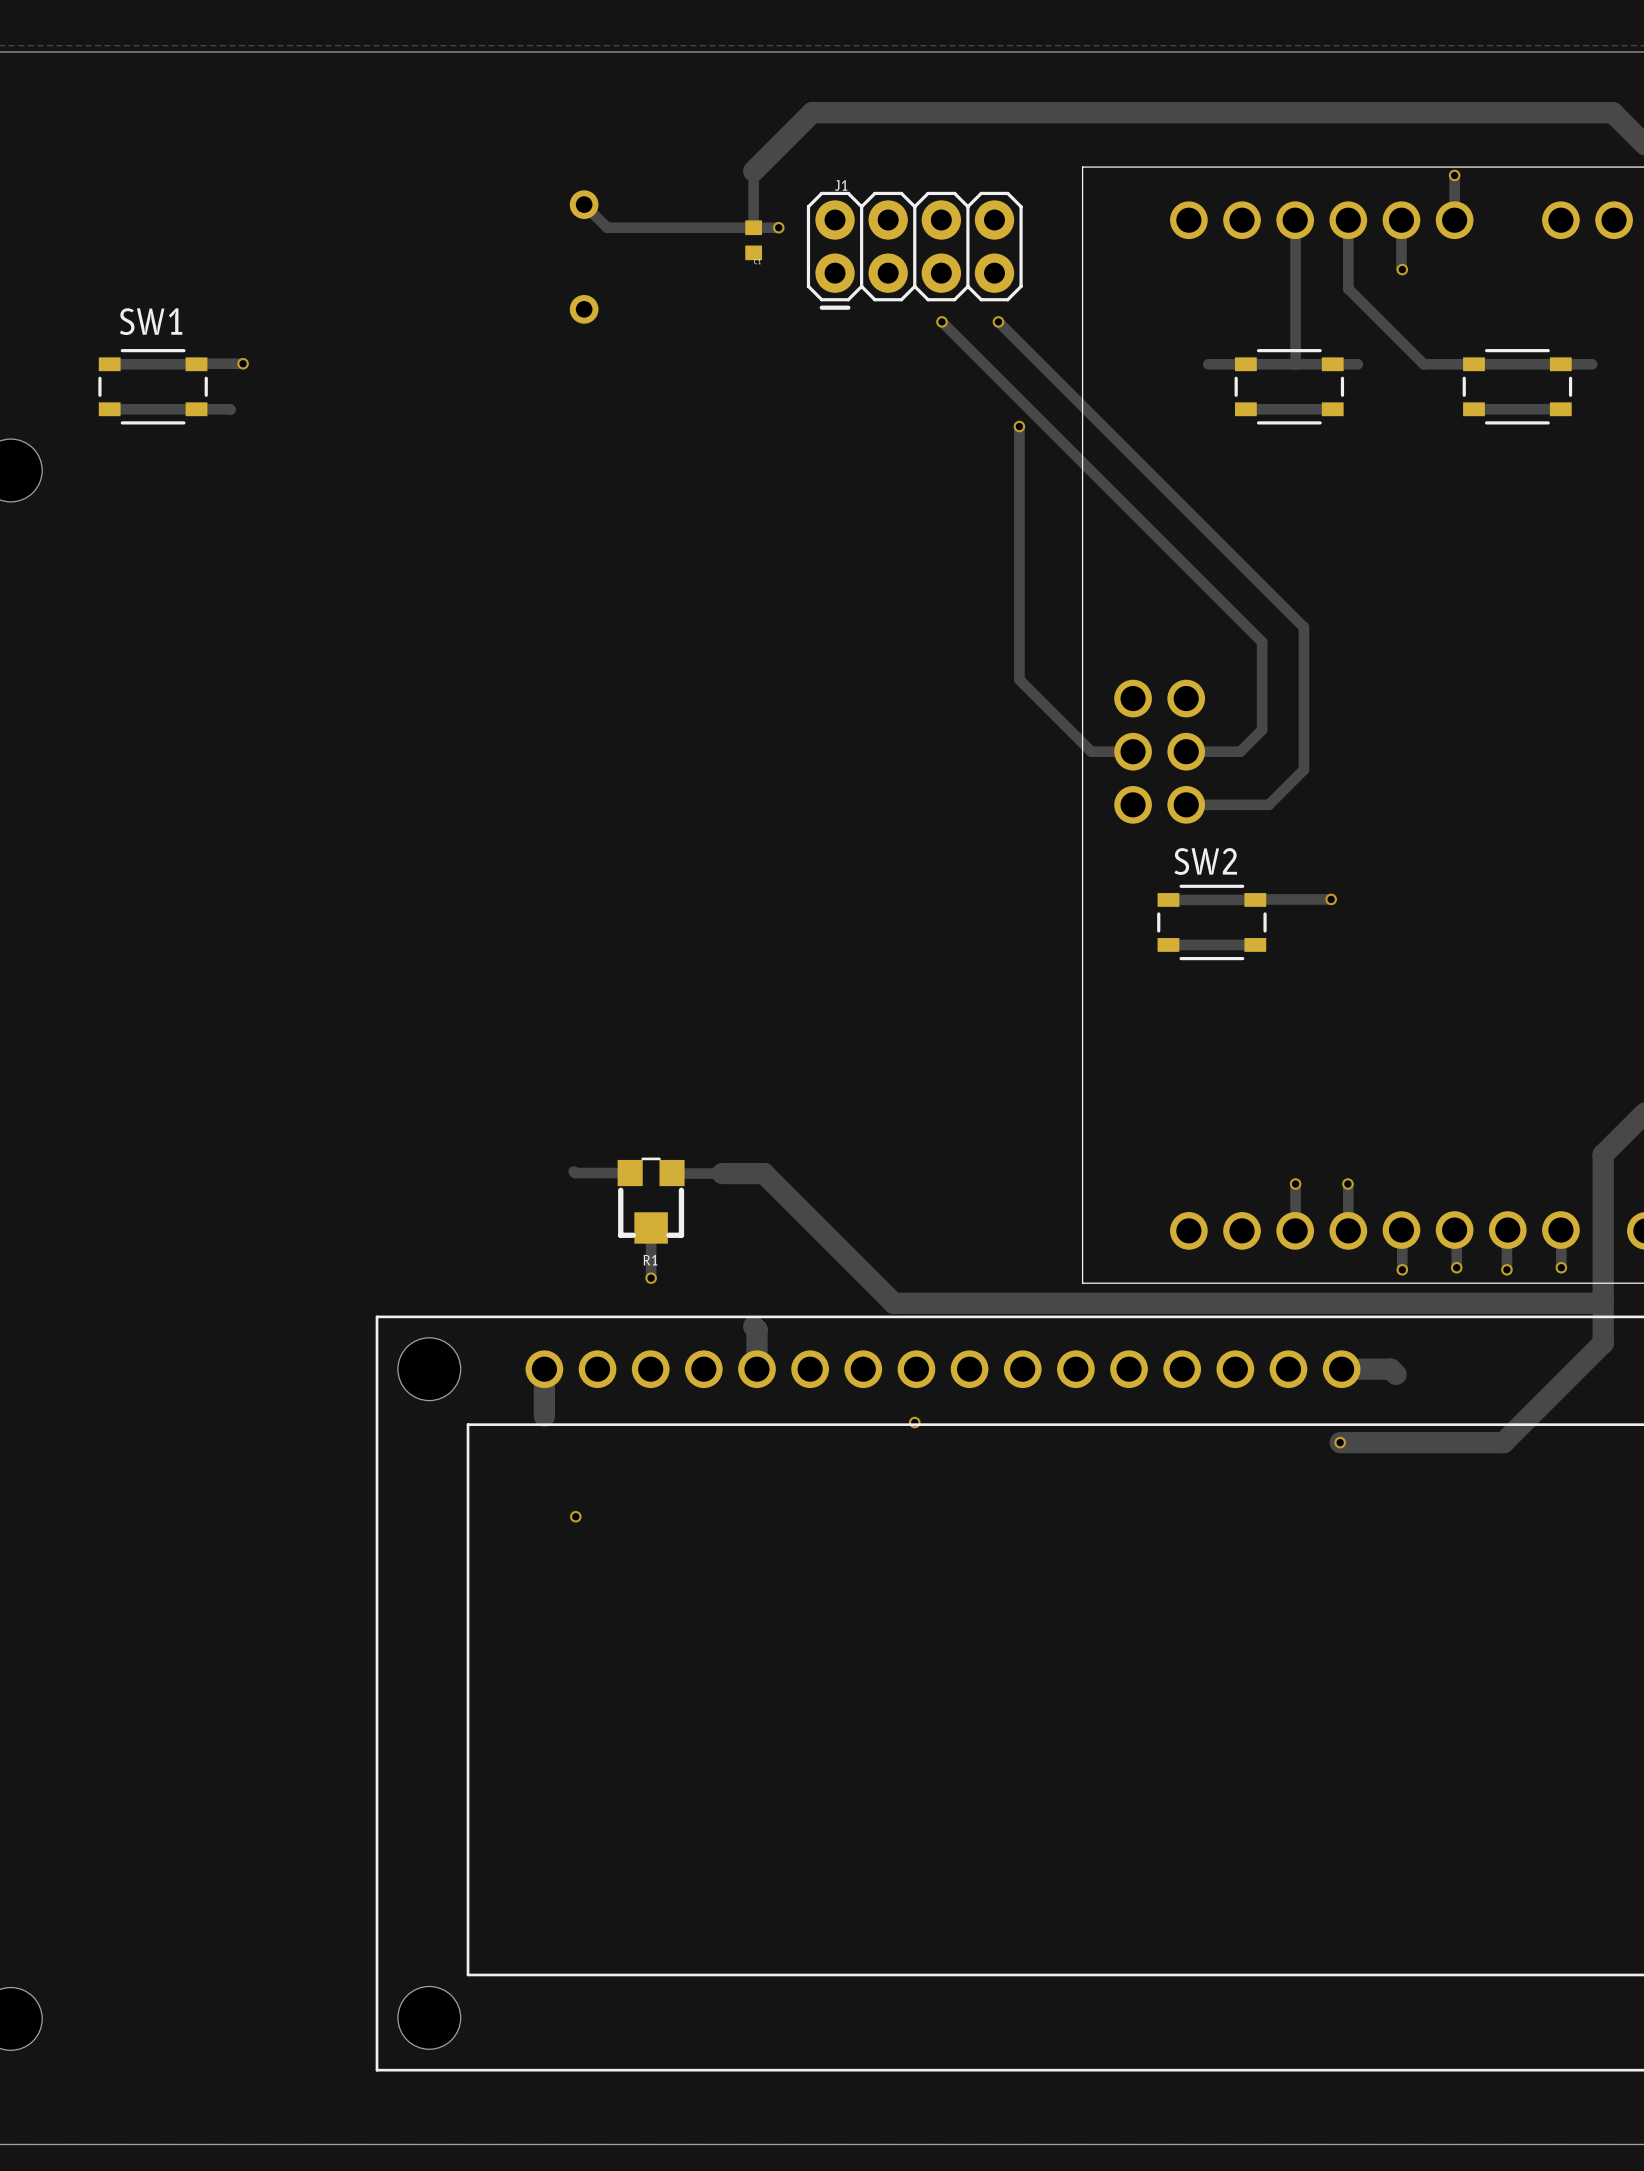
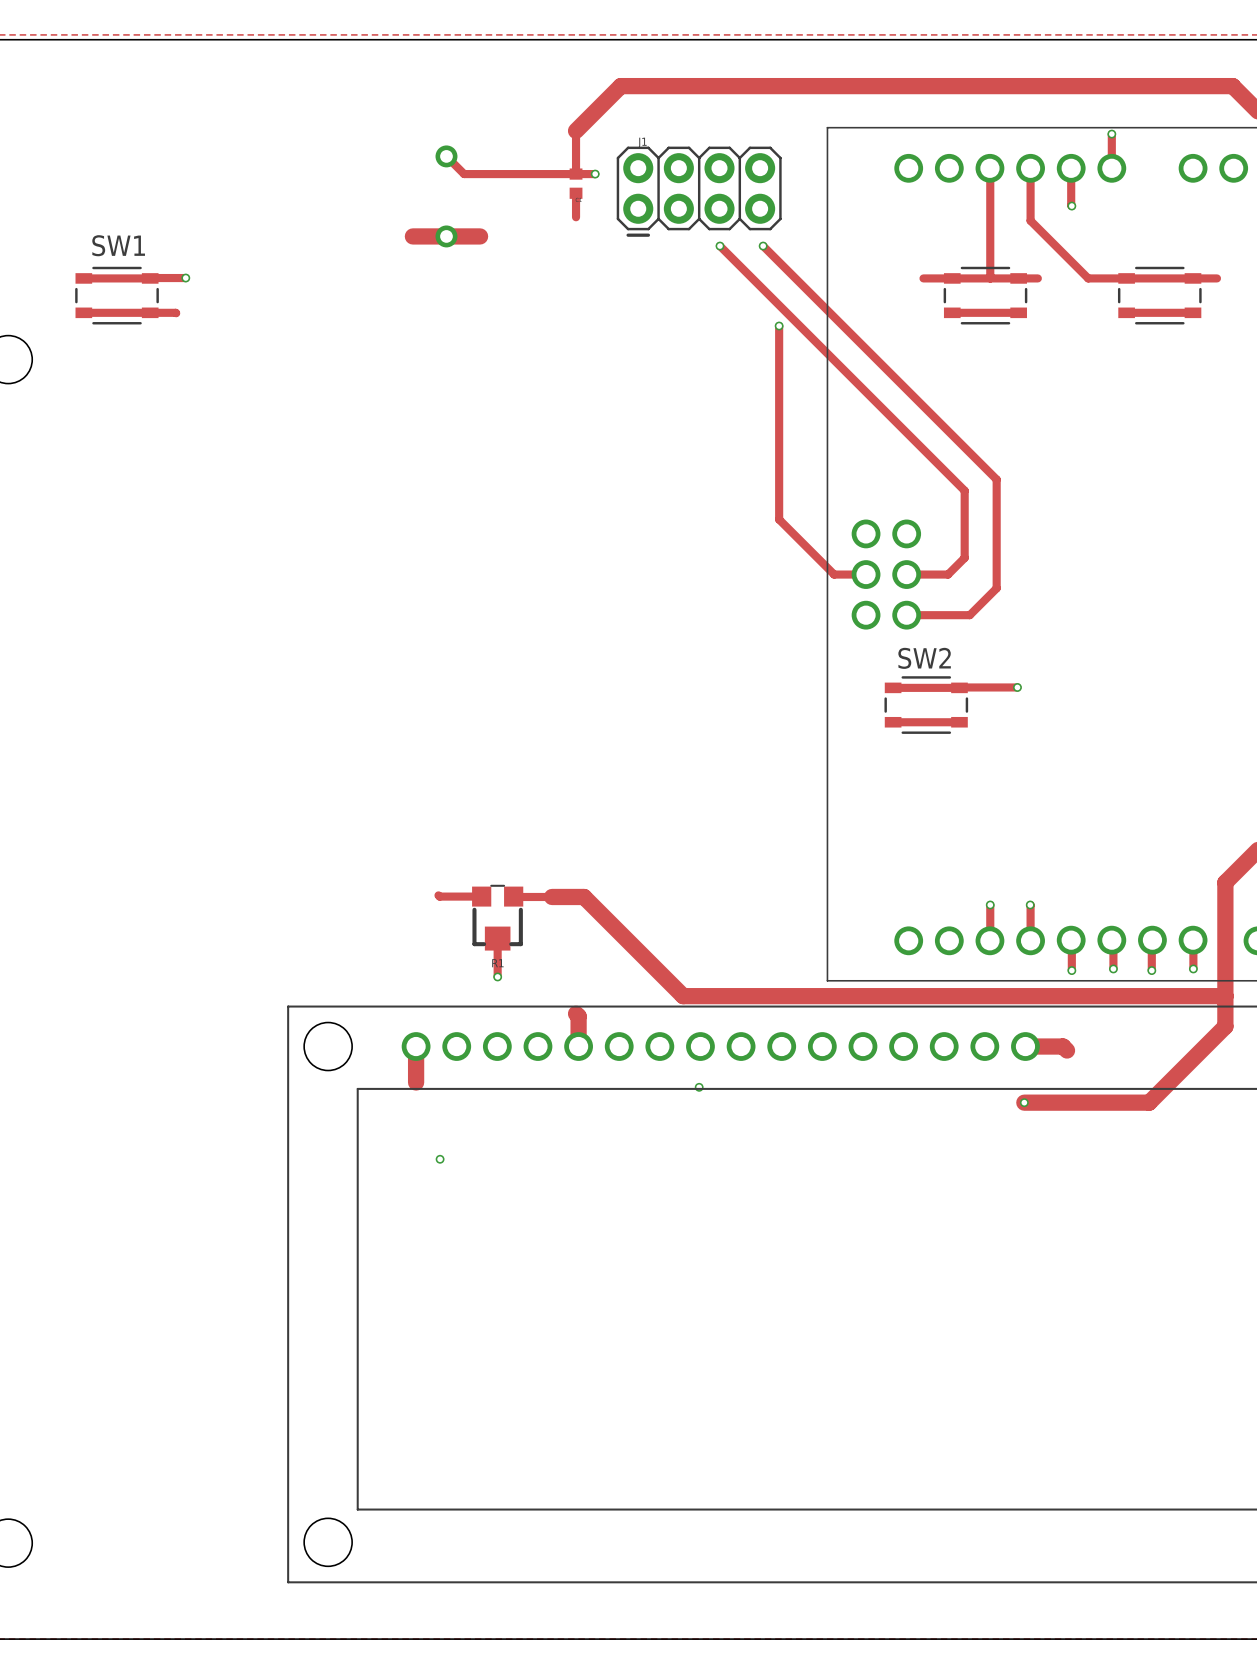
track: none -> (576, 193) (576, 217)
track: none -> (412, 236) (480, 236)

